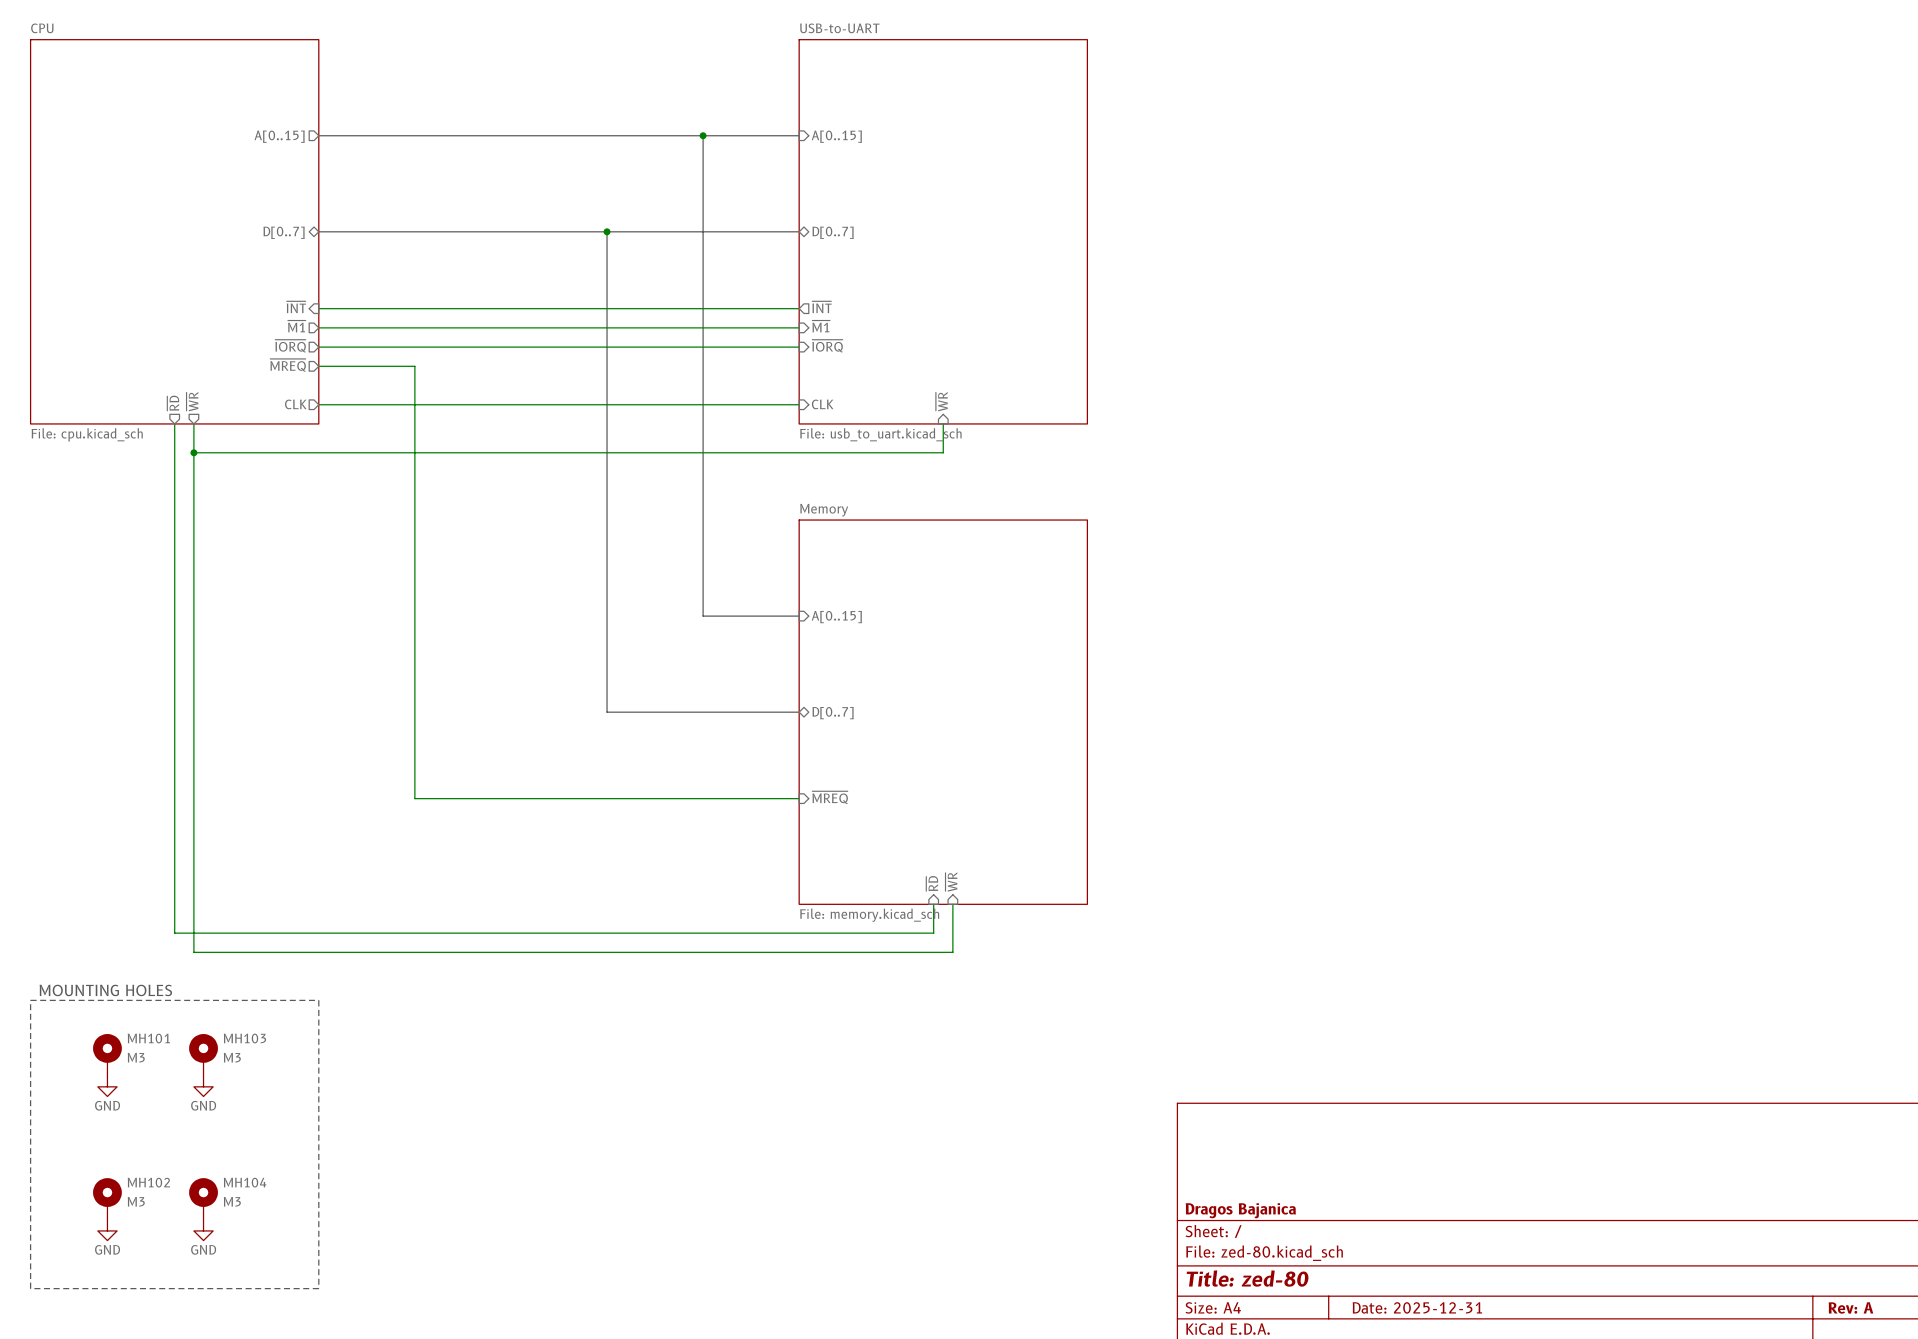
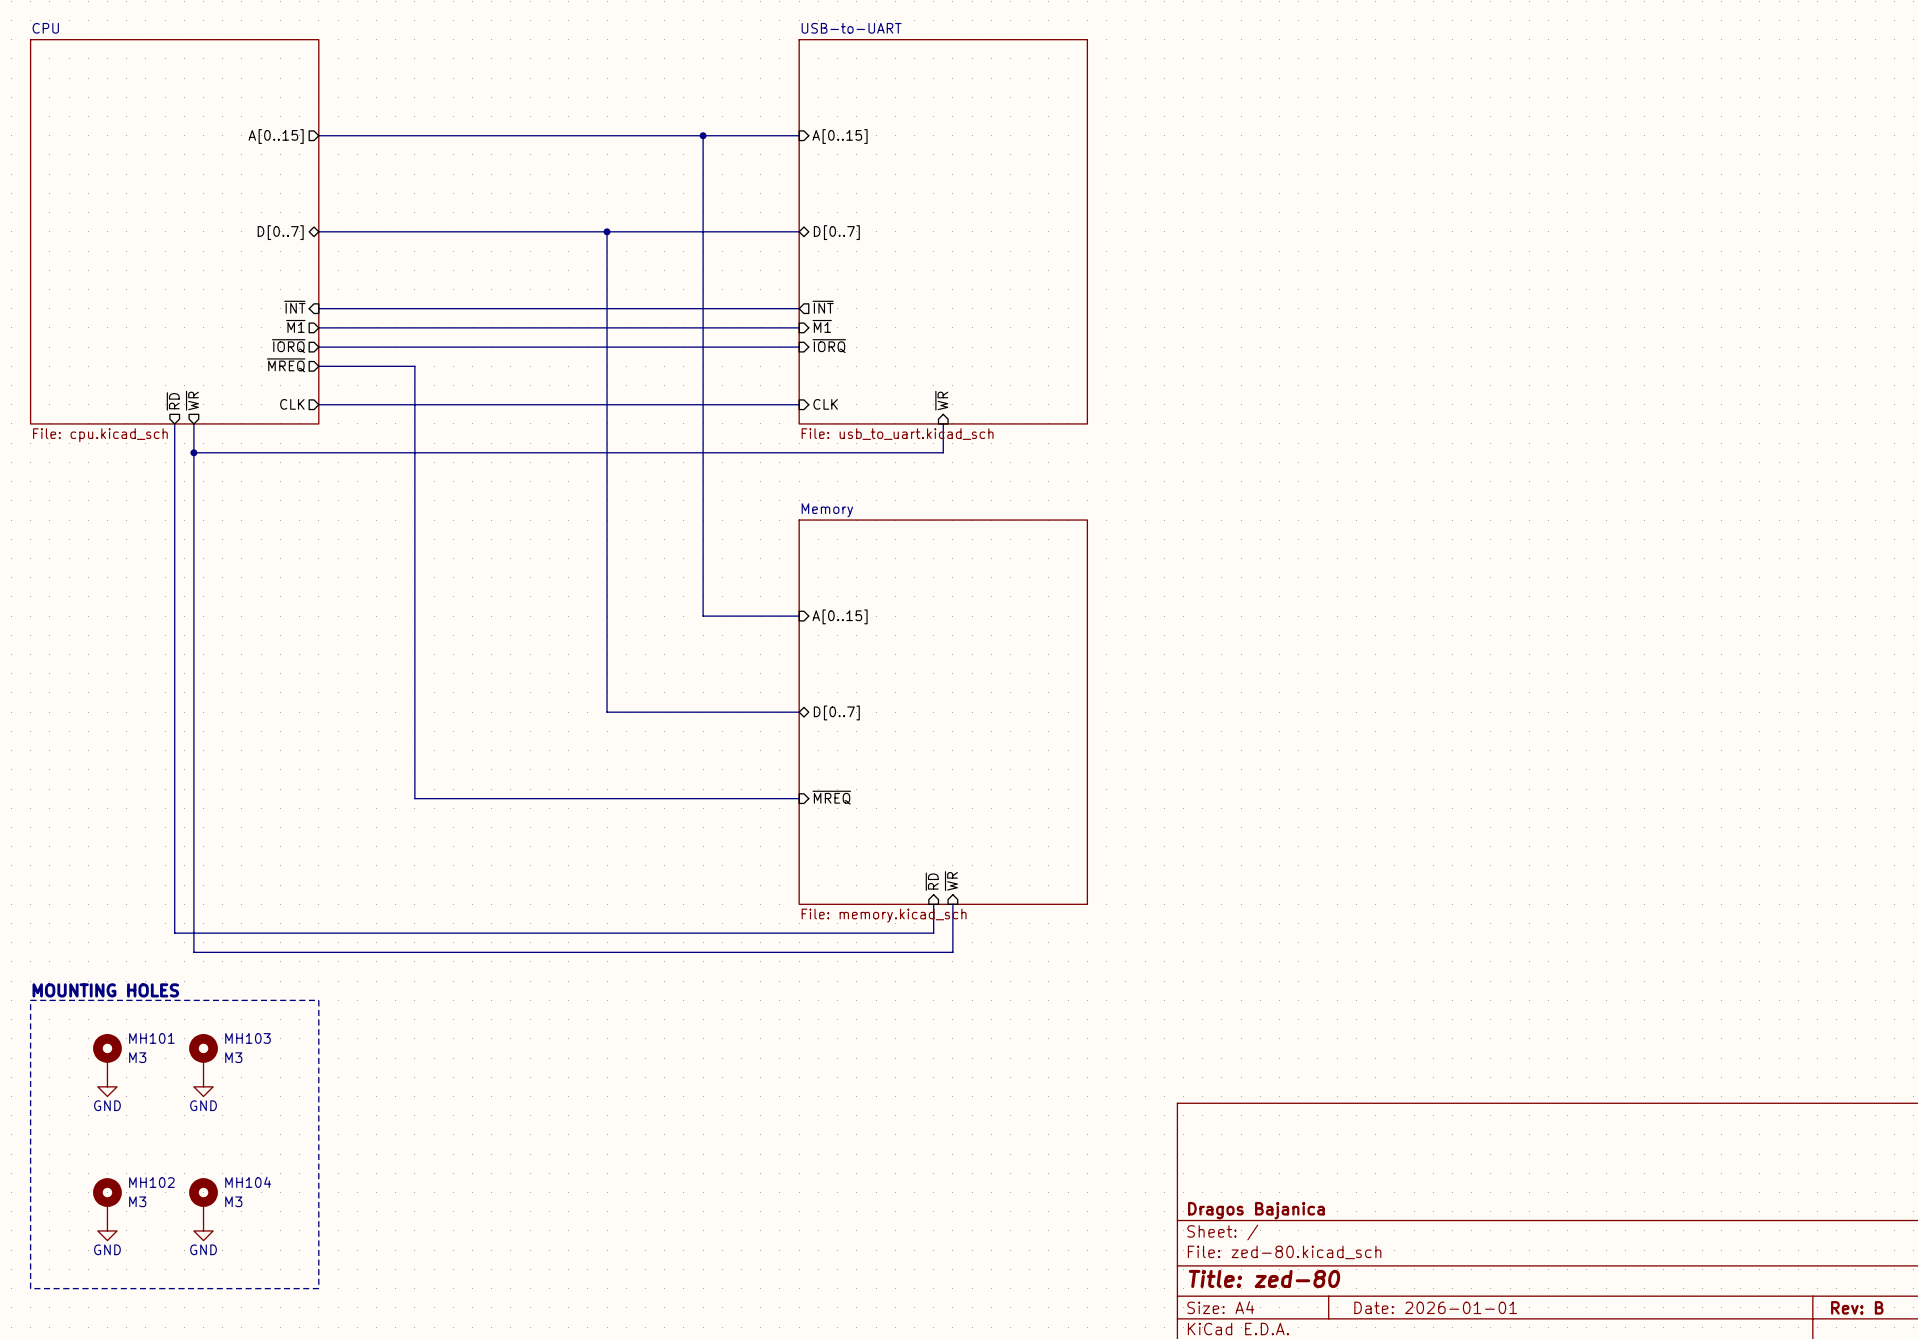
title block: Date: 2025-12-31 (1417, 1307) -> Date: 2026-01-01 (1435, 1307)
title block: Rev: A (1850, 1307) -> Rev: B (1857, 1307)

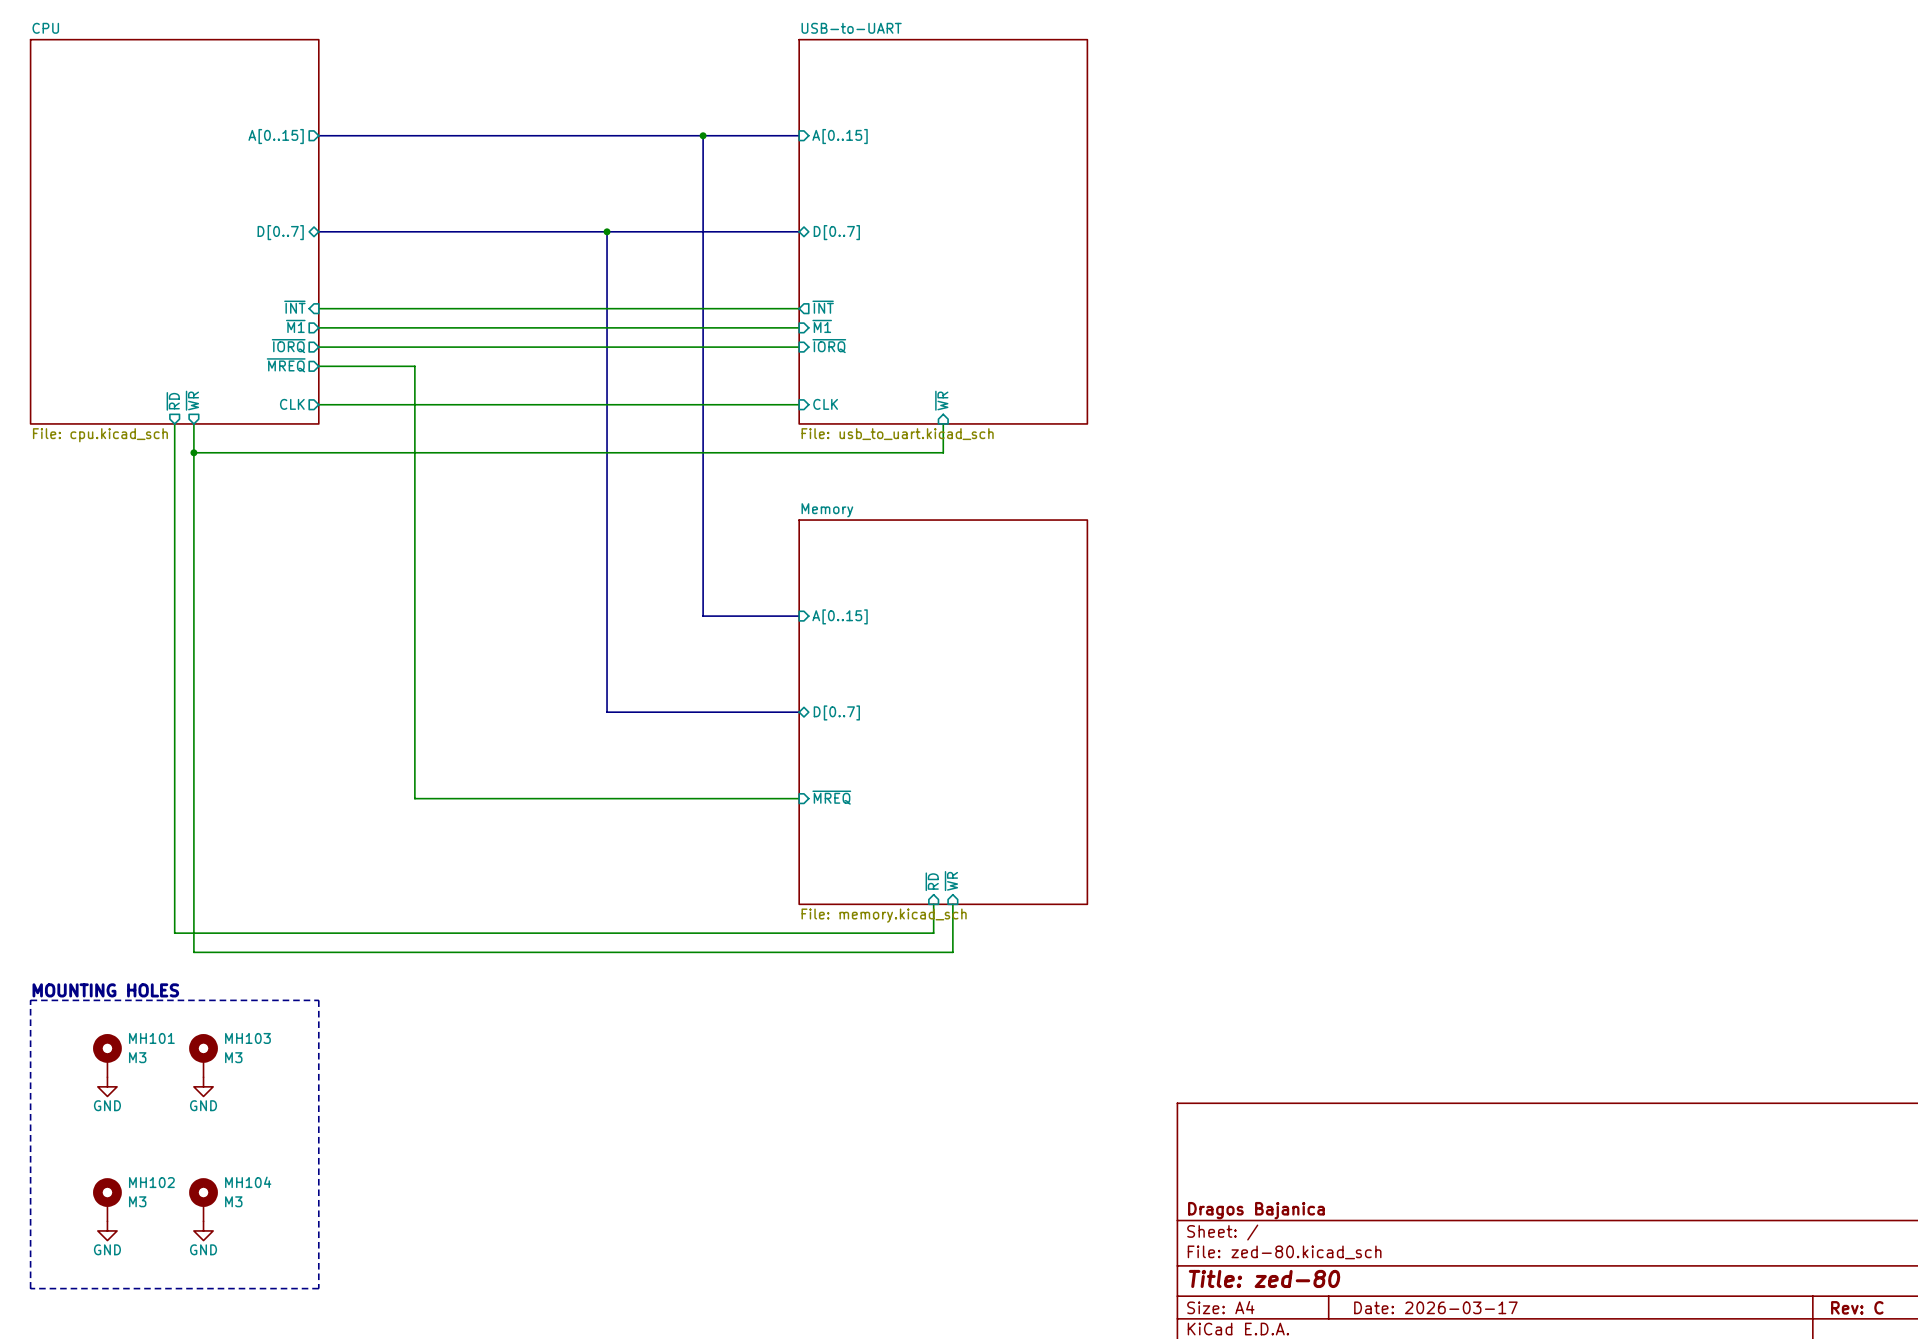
title block: Date: 2026-01-01 (1435, 1307) -> Date: 2026-03-17 (1435, 1307)
title block: Rev: B (1857, 1307) -> Rev: C (1857, 1307)

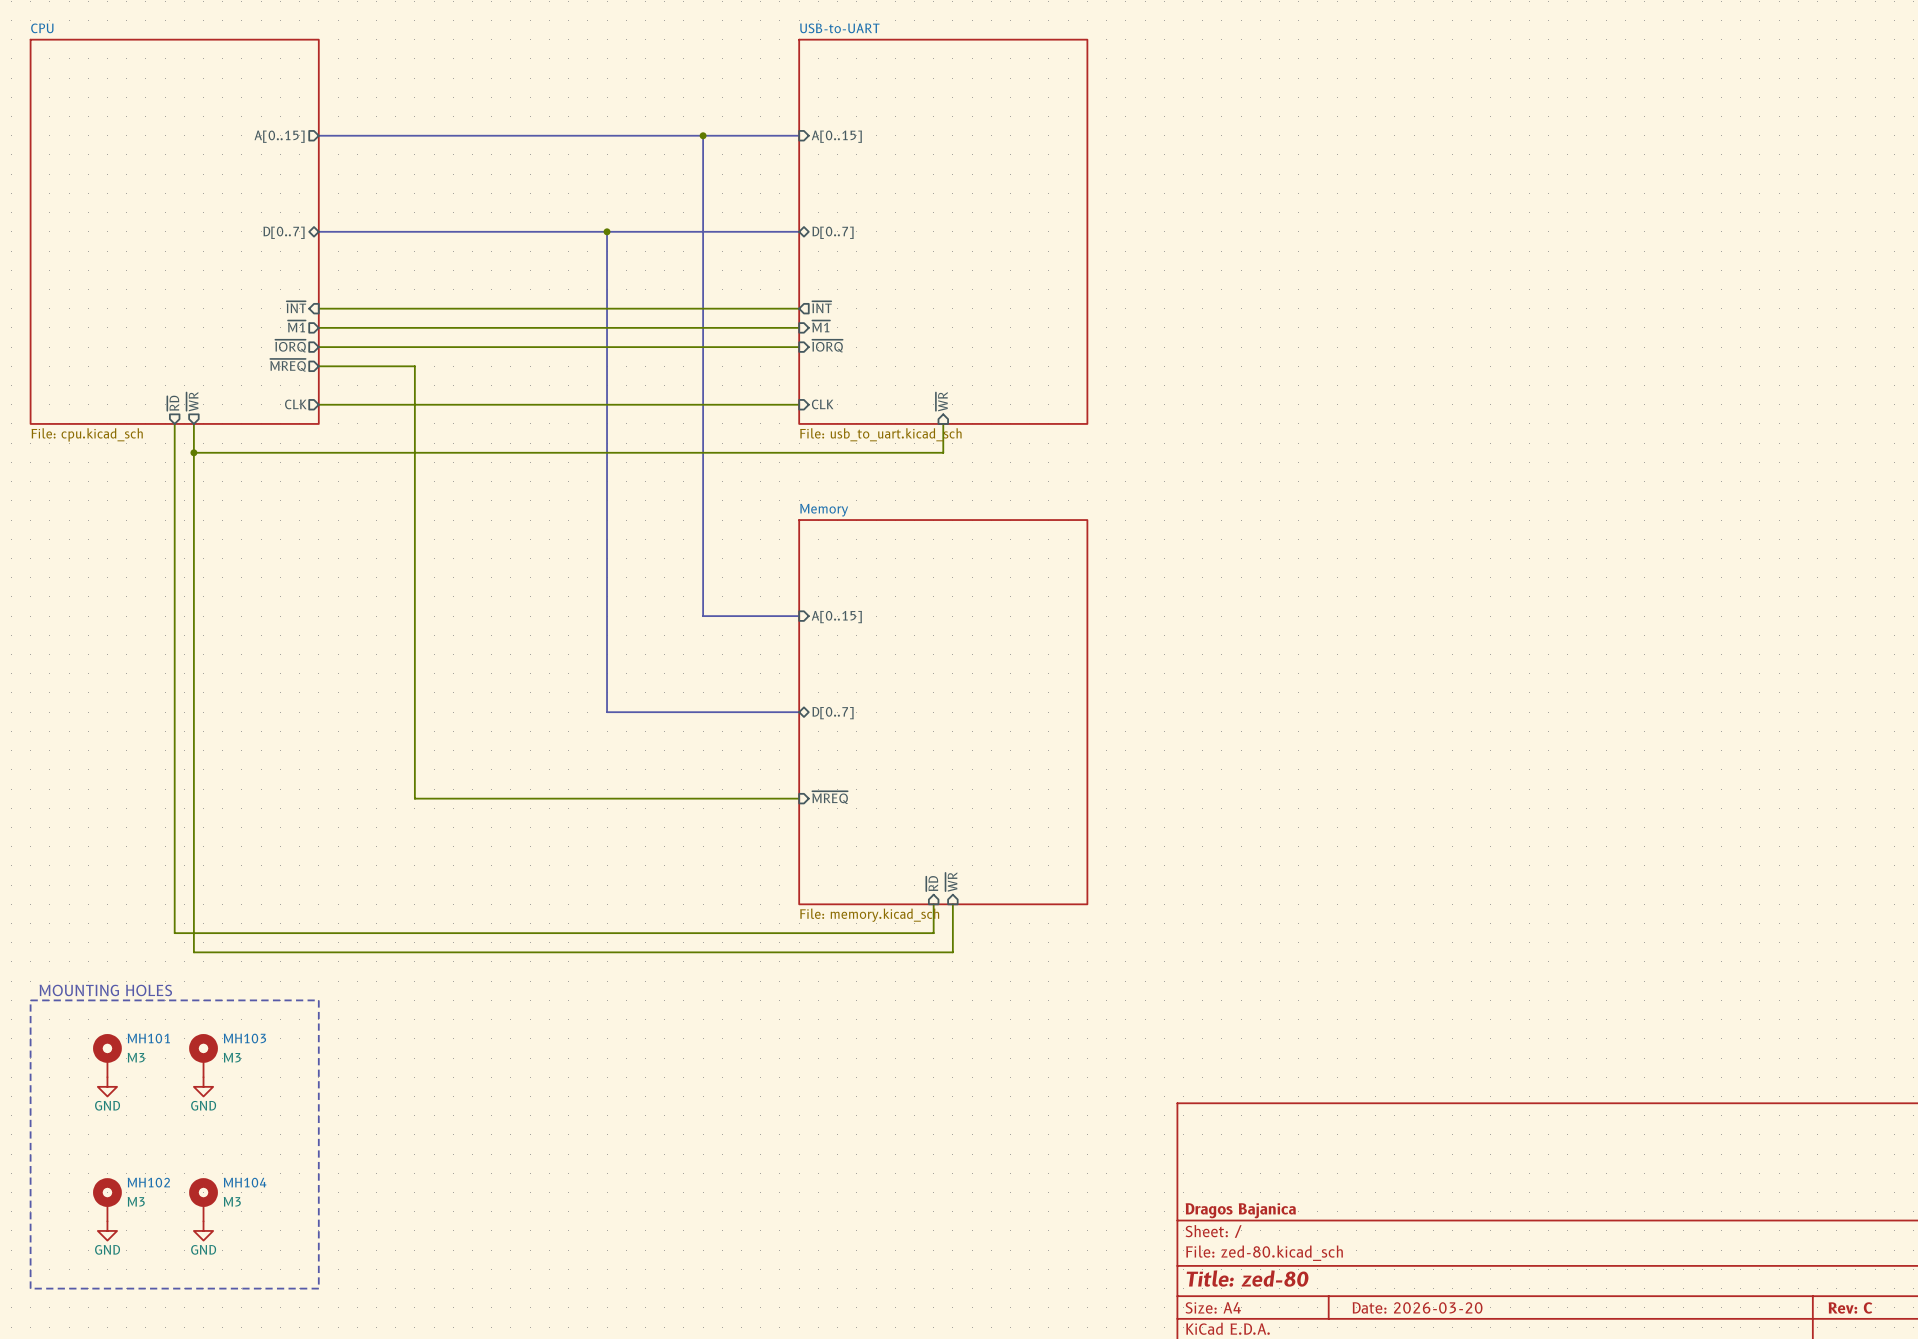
title block: Date: 2026-03-17 (1435, 1307) -> Date: 2026-03-20 (1417, 1307)

